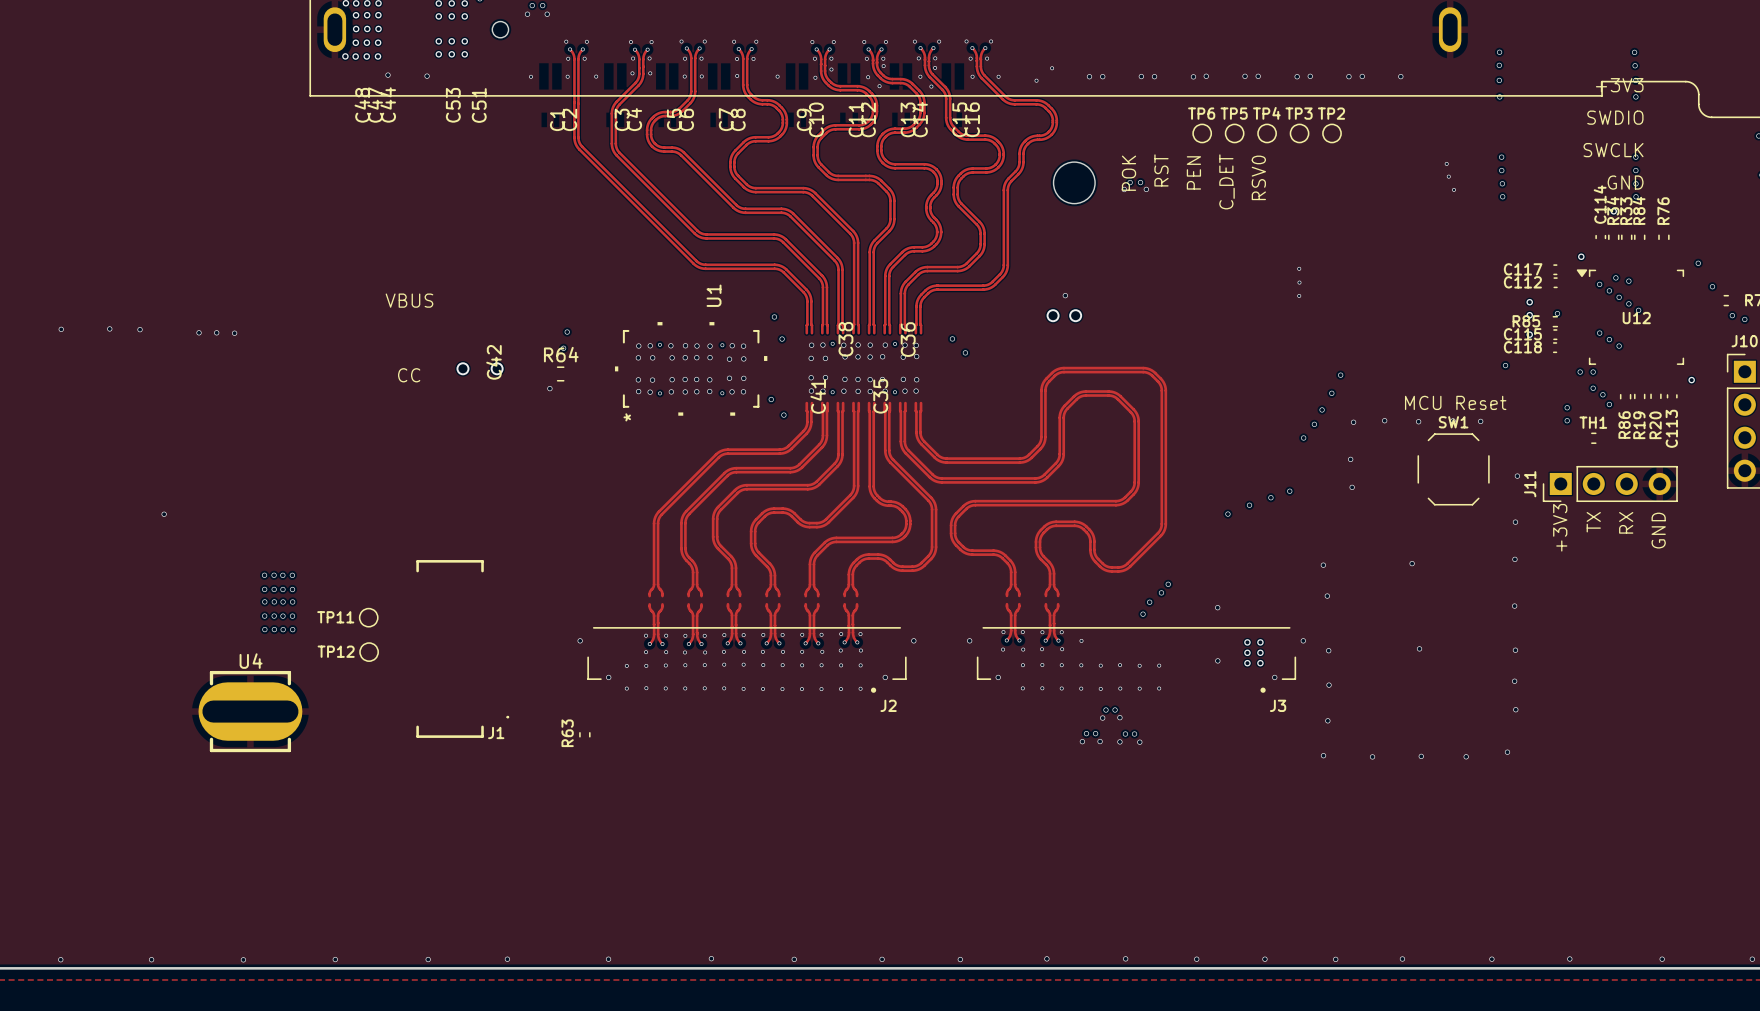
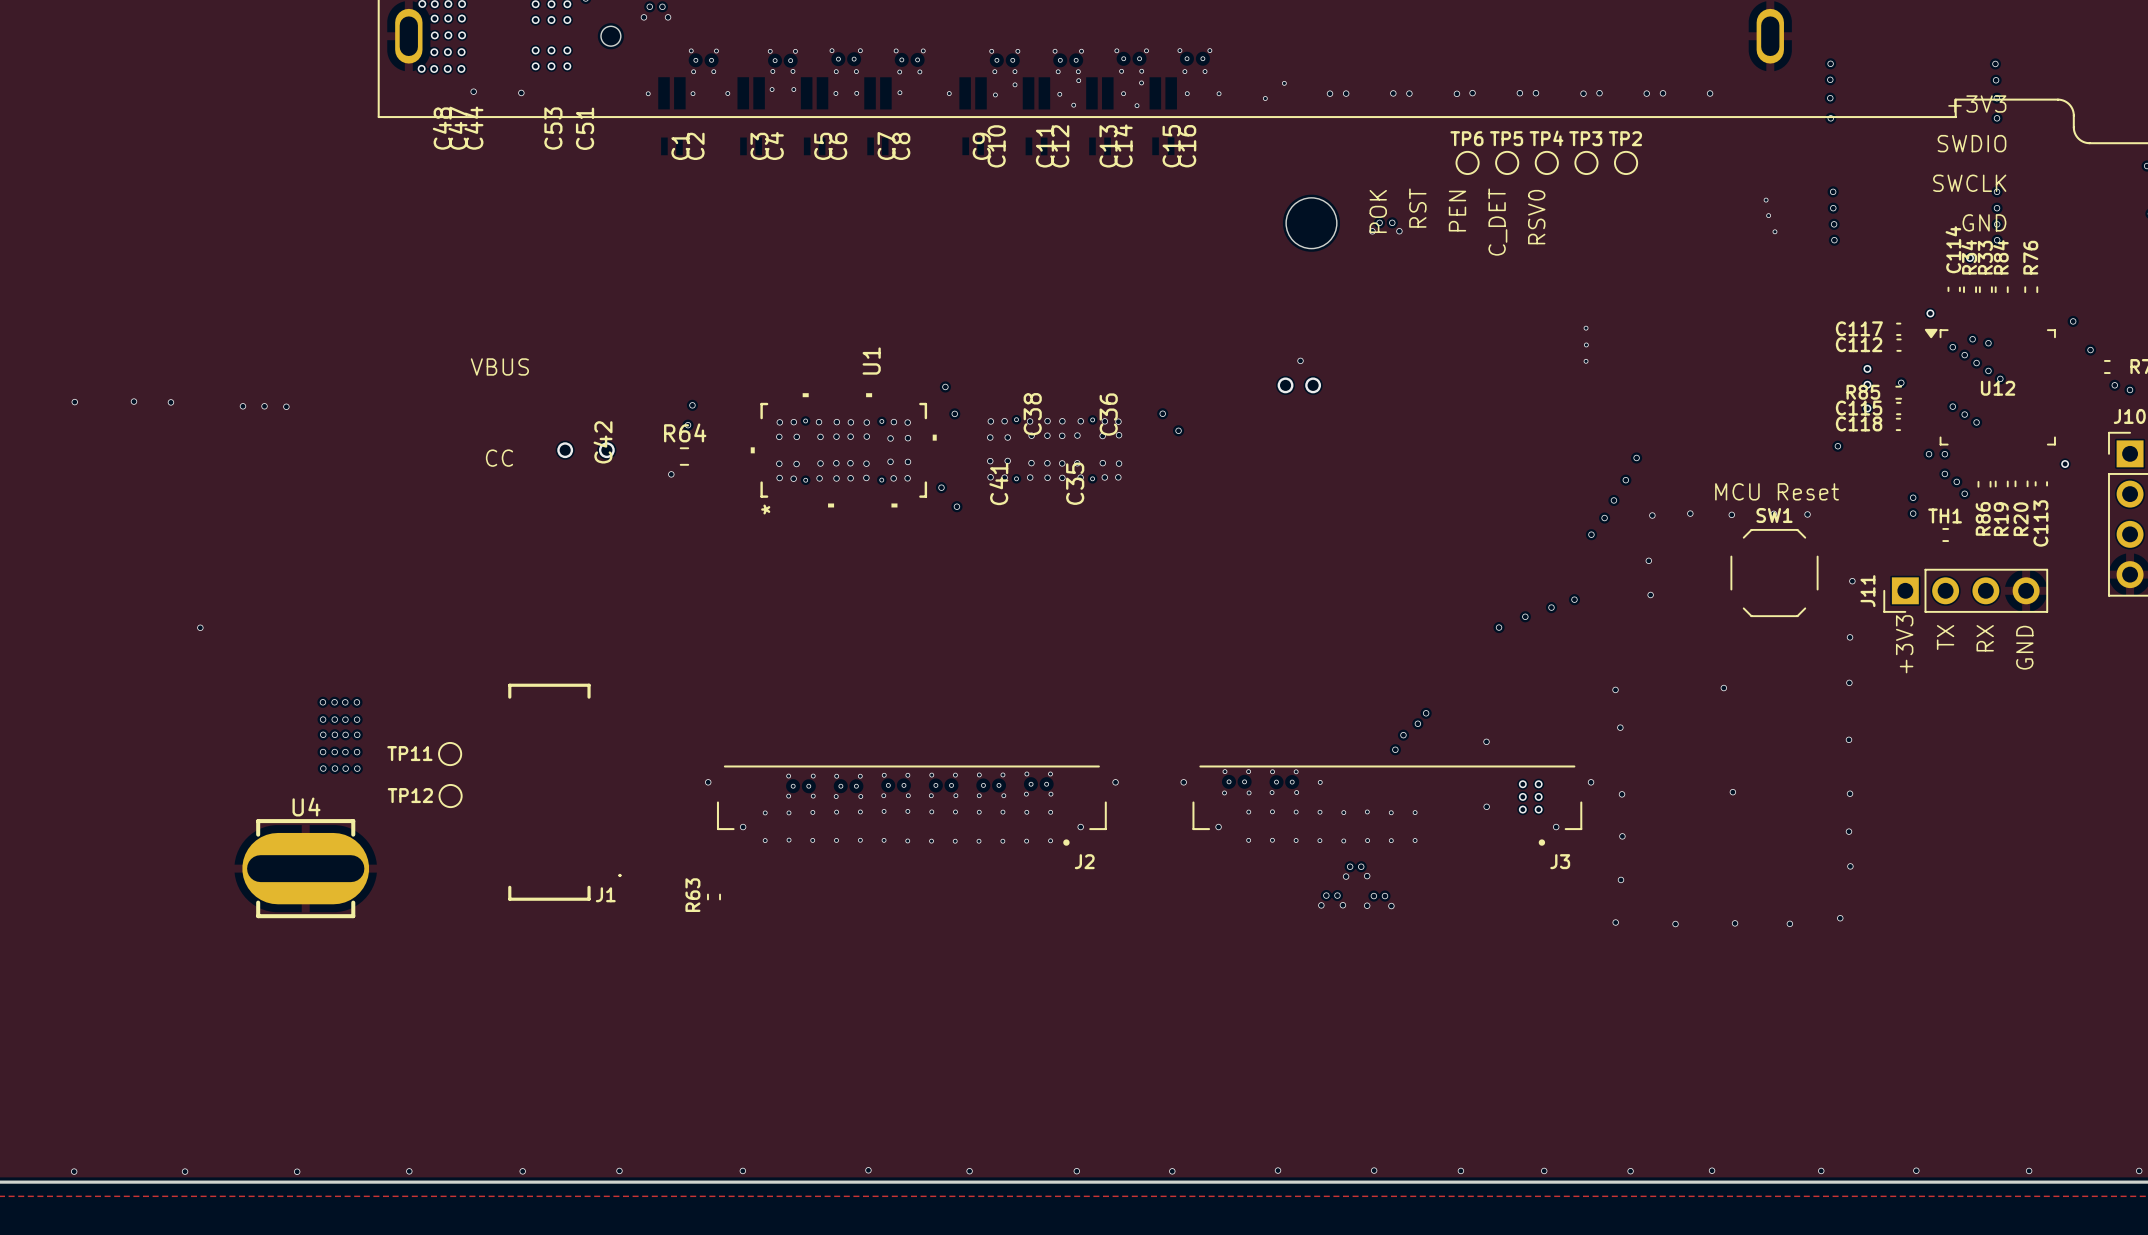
track: (686, 48) (691, 56) (690, 96) (676, 110) (660, 112) (650, 119) (647, 128) (649, 142) (657, 150) (674, 151) (680, 154) (737, 210) (745, 212) (782, 212) (788, 214) (834, 260) (838, 269) (837, 333) -> none
track: (699, 48) (695, 56) (693, 97) (679, 113) (661, 116) (654, 121) (651, 134) (654, 143) -> none
track: (920, 48) (924, 53) (925, 59) -> none
track: (933, 48) (929, 55) (929, 67) (948, 92) (952, 125) (964, 135) (986, 135) (994, 138) (1002, 147) (1003, 156) (1000, 164) (995, 169) (988, 172) (967, 173) (960, 179) (957, 185) (959, 201) (983, 227) (984, 244) (982, 252) (964, 269) (923, 271) (908, 284) (904, 292) (905, 333) -> none
track: (972, 48) (976, 54) (979, 74) (1002, 99) (1012, 104) (1042, 105) (1051, 114) (1052, 125) (1046, 133) (1031, 137) (1023, 143) (1019, 151) (1018, 167) (1004, 185) (1003, 265) (1001, 272) (991, 282) (985, 285) (937, 285) (927, 289) (917, 302) (915, 333) -> none
track: (985, 48) (980, 57) (981, 68) (984, 75) (1009, 99) (1038, 100) (1046, 103) (1055, 114) (1056, 125) (1053, 131) (1048, 137) (1032, 140) (1026, 145) (1023, 151) (1022, 168) (1008, 186) (1007, 265) (1004, 274) (993, 286) (987, 289) (937, 289) (930, 291) (920, 304) (921, 333) -> none
track: (570, 49) (574, 57) (574, 102) -> none
track: (582, 49) (578, 59) (578, 137) (581, 145) (698, 262) (705, 264) (776, 264) (784, 268) (810, 295) (811, 333) -> none
track: (634, 49) (639, 58) (638, 78) (615, 103) (612, 109) (611, 143) (614, 152) (698, 236) (706, 238) (775, 238) (782, 241) (821, 282) (822, 333) -> none
track: (647, 49) (643, 56) (641, 81) (616, 109) (615, 143) (618, 150) (700, 232) (775, 234) (784, 238) (825, 280) (827, 333) -> none
track: (738, 49) (743, 57) (743, 86) (745, 92) (755, 102) (775, 107) (781, 114) (782, 124) (779, 131) (773, 136) (752, 137) (743, 142) (731, 156) (731, 173) (743, 187) (751, 191) (809, 193) (851, 234) (854, 243) (853, 333) -> none
track: (751, 49) (747, 57) (748, 89) (756, 98) (770, 100) (778, 104) (785, 113) (786, 124) (783, 132) (776, 139) (753, 141) (746, 145) (735, 157) (735, 171) (747, 185) (753, 187) (803, 188) (811, 190) (854, 232) (858, 242) (858, 333) -> none
track: (816, 49) (820, 55) (821, 64) -> none
track: (829, 49) (825, 58) (825, 72) (827, 78) (836, 85) (859, 86) (866, 89) (875, 99) (876, 113) (873, 121) (865, 128) (834, 129) (827, 132) (818, 143) (818, 160) (834, 175) (869, 175) (877, 178) (890, 190) (894, 198) (893, 225) (873, 249) (874, 333) -> none
track: (868, 49) (873, 60) -> none
track: (881, 49) (877, 58) (877, 66) (879, 71) (888, 78) (904, 79) (910, 81) (921, 93) (924, 102) (924, 116) (920, 123) (910, 131) (892, 132) (886, 135) (881, 143) (882, 155) (886, 161) (892, 164) (930, 165) (938, 172) (941, 181) (940, 189) (931, 200) (930, 206) (931, 214) (940, 226) (939, 240) (928, 249) (906, 253) (889, 272) (889, 333) -> none
track: (924, 59) (927, 73) (945, 94) (946, 120) (949, 128) (963, 139) (991, 141) (998, 147) (999, 156) (996, 163) (991, 167) (964, 170) (957, 176) (954, 184) (955, 202) (979, 228) (979, 250) (962, 266) (922, 267) (905, 281) (901, 291) (900, 333) -> none
track: (873, 60) (874, 70) (881, 79) (889, 82) (906, 84) (917, 94) (920, 101) (919, 116) (912, 125) (906, 128) (890, 129) (880, 136) (877, 146) (879, 158) (885, 165) (891, 167) (929, 169) (935, 174) (937, 181) (936, 188) (928, 198) (926, 206) (928, 216) (936, 227) (935, 238) (927, 246) (905, 249) (890, 264) (886, 271) (884, 333) -> none
track: (821, 64) (822, 77) (828, 85) (838, 90) (858, 90) (864, 92) (872, 100) (872, 112) (870, 119) (862, 124) (833, 125) (823, 130) (814, 142) (815, 163) (827, 176) (833, 179) (874, 180) (887, 192) (890, 198) (889, 224) (873, 241) (870, 248) (869, 333) -> none
track: (574, 102) (574, 139) (577, 147) (693, 263) (703, 268) (774, 268) (781, 270) (806, 296) (806, 333) -> none
track: (655, 143) (660, 146) (675, 147) (682, 151) (739, 207) (783, 208) (789, 211) (837, 257) (842, 268) (843, 333) -> none
track: (806, 403) (806, 426) (786, 447) (780, 449) (727, 449) (720, 451) (657, 513) (654, 523) (654, 585) (649, 596) -> none
track: (811, 403) (810, 428) (790, 449) (781, 453) (721, 455) (660, 515) (658, 523) (658, 584) (662, 596) -> none
track: (822, 403) (821, 440) (798, 465) (791, 468) (729, 469) (684, 513) (681, 521) (681, 550) (693, 571) (692, 585) (688, 596) -> none
track: (827, 403) (825, 442) (800, 468) (790, 472) (731, 473) (687, 515) (685, 521) (685, 551) (695, 566) (697, 585) (701, 596) -> none
track: (837, 403) (837, 458) (815, 482) (808, 485) (742, 485) (734, 490) (715, 510) (713, 518) (713, 541) (729, 560) (731, 566) (731, 585) (727, 595) -> none
track: (843, 403) (841, 459) (838, 465) (818, 485) (809, 489) (743, 489) (718, 512) (717, 540) (734, 561) (736, 586) (740, 595) -> none
track: (853, 403) (854, 485) (851, 494) (820, 522) (805, 522) (789, 509) (774, 508) (763, 512) (752, 525) (752, 550) (770, 573) (770, 585) (766, 596) -> none
track: (858, 403) (858, 485) (854, 496) (828, 522) (821, 526) (805, 526) (787, 513) (774, 512) (765, 515) (756, 526) (755, 547) (772, 567) (775, 585) (779, 596) -> none
track: (869, 403) (870, 491) (879, 502) (895, 506) (902, 511) (906, 518) (905, 527) (901, 534) (895, 537) (836, 537) (826, 541) (811, 557) (809, 585) (805, 596) -> none
track: (874, 403) (874, 490) (881, 499) (897, 503) (905, 509) (909, 517) (909, 528) (904, 536) (894, 541) (836, 541) (829, 544) (816, 556) (814, 561) (814, 585) (818, 596) -> none
track: (884, 403) (886, 455) (890, 462) (930, 503) (931, 549) (921, 562) (913, 566) (897, 565) (881, 554) (860, 556) (850, 568) (848, 585) (844, 596) -> none
track: (889, 403) (889, 454) (934, 503) (935, 550) (933, 556) (924, 565) (914, 570) (896, 569) (880, 558) (862, 560) (853, 572) (852, 585) (857, 596) -> none
track: (900, 403) (900, 441) (903, 449) (931, 478) (941, 482) (1035, 482) (1044, 479) (1059, 464) (1062, 459) (1064, 412) (1082, 396) (1113, 396) (1133, 415) (1134, 483) (1131, 490) (1122, 499) (973, 501) (965, 504) (954, 515) (951, 523) (951, 536) (960, 549) (969, 554) (997, 555) (1008, 565) (1011, 585) (1006, 595) -> none
track: (905, 403) (906, 447) (933, 475) (941, 478) (1035, 478) (1042, 476) (1059, 457) (1061, 411) (1074, 396) (1081, 392) (1115, 392) (1136, 413) (1138, 421) (1138, 484) (1135, 492) (1123, 503) (1115, 505) (974, 505) (967, 508) (957, 518) (955, 535) (964, 547) (971, 550) (997, 551) (1011, 561) (1014, 570) (1015, 585) (1019, 595) -> none
track: (915, 403) (917, 438) (938, 460) (946, 462) (1021, 462) (1030, 458) (1044, 443) (1045, 388) (1048, 382) (1057, 373) (1144, 372) (1151, 375) (1159, 383) (1161, 390) (1160, 530) (1126, 564) (1120, 567) (1110, 567) (1104, 565) (1096, 557) (1093, 535) (1084, 525) (1074, 521) (1048, 523) (1038, 532) (1036, 541) (1037, 553) (1049, 571) (1049, 585) (1045, 595) -> none
track: (921, 403) (921, 437) (940, 457) (1021, 458) (1028, 455) (1040, 441) (1042, 386) (1044, 380) (1056, 370) (1063, 368) (1145, 368) (1153, 371) (1162, 380) (1165, 390) (1165, 523) (1163, 531) (1128, 567) (1122, 570) (1111, 571) (1103, 569) (1093, 559) (1089, 536) (1081, 527) (1074, 525) (1054, 525) (1048, 527) (1040, 537) (1040, 548) (1042, 554) (1052, 567) (1054, 585) (1058, 595) -> none
track: (649, 604) (653, 614) (654, 634) (649, 644) -> none
track: (662, 604) (658, 614) (658, 622) -> none
track: (688, 604) (692, 614) (693, 634) -> none
track: (701, 604) (697, 614) (697, 632) -> none
track: (727, 604) (731, 614) (732, 626) -> none
track: (740, 604) (736, 614) (735, 624) -> none
track: (766, 604) (770, 614) (770, 627) -> none
track: (779, 604) (775, 614) (774, 625) -> none
track: (805, 604) (809, 615) (809, 633) (805, 643) -> none
track: (818, 604) (813, 615) (813, 633) (818, 643) -> none
track: (844, 604) (848, 614) (848, 625) -> none
track: (857, 604) (852, 614) (852, 624) -> none
track: (1006, 604) (1011, 614) (1011, 630) (1006, 640) -> none
track: (1019, 604) (1015, 614) (1015, 630) (1019, 640) -> none
track: (1045, 604) (1049, 614) (1050, 630) (1045, 640) -> none
track: (1058, 604) (1054, 614) (1054, 623) -> none
track: (658, 623) (658, 636) (662, 644) -> none
track: (1054, 623) (1054, 634) (1058, 640) -> none
track: (852, 624) (853, 635) (857, 642) -> none
track: (736, 625) (736, 636) (740, 643) -> none
track: (775, 625) (775, 636) (779, 643) -> none
track: (732, 626) (731, 637) (727, 643) -> none
track: (848, 626) (848, 636) (844, 642) -> none
track: (771, 627) (770, 637) (766, 643) -> none
track: (697, 632) (701, 644) -> none
track: (693, 634) (688, 644) -> none

